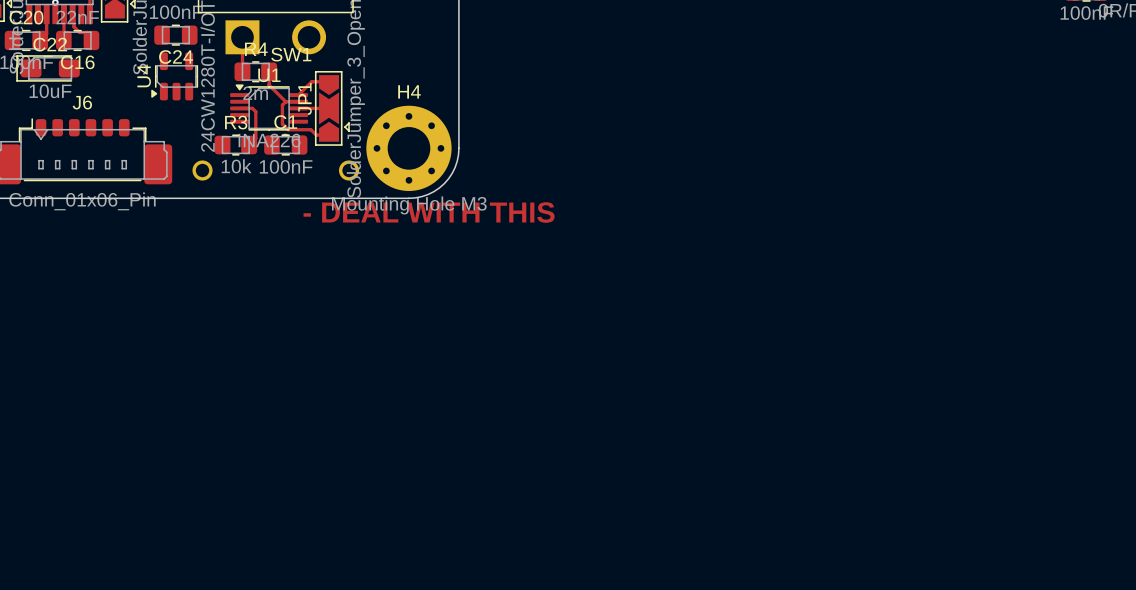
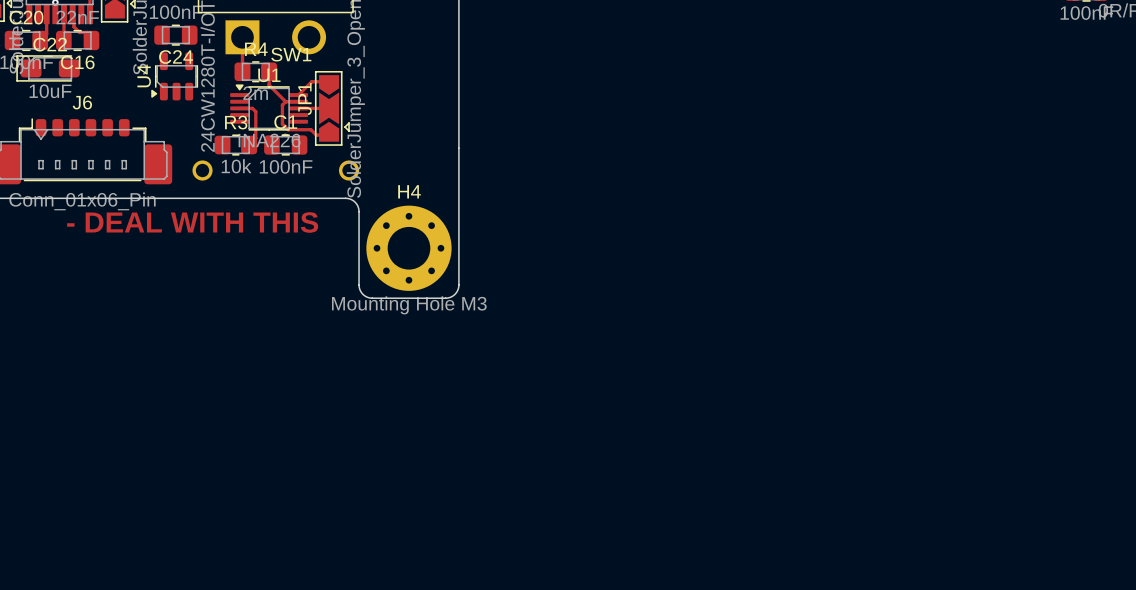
H4 position: (408, 148) -> (408, 248)
board edge: (458, 148) (457, 161) (448, 178) (439, 187) (428, 194) (408, 198) (345, 198) -> (458, 148) (458, 284) (456, 291) (451, 296) (372, 298) (362, 294) (359, 284) (358, 208) (354, 201) (345, 198)
text position: - DEAL WITH THIS (429, 212) -> - DEAL WITH THIS (192, 222)

